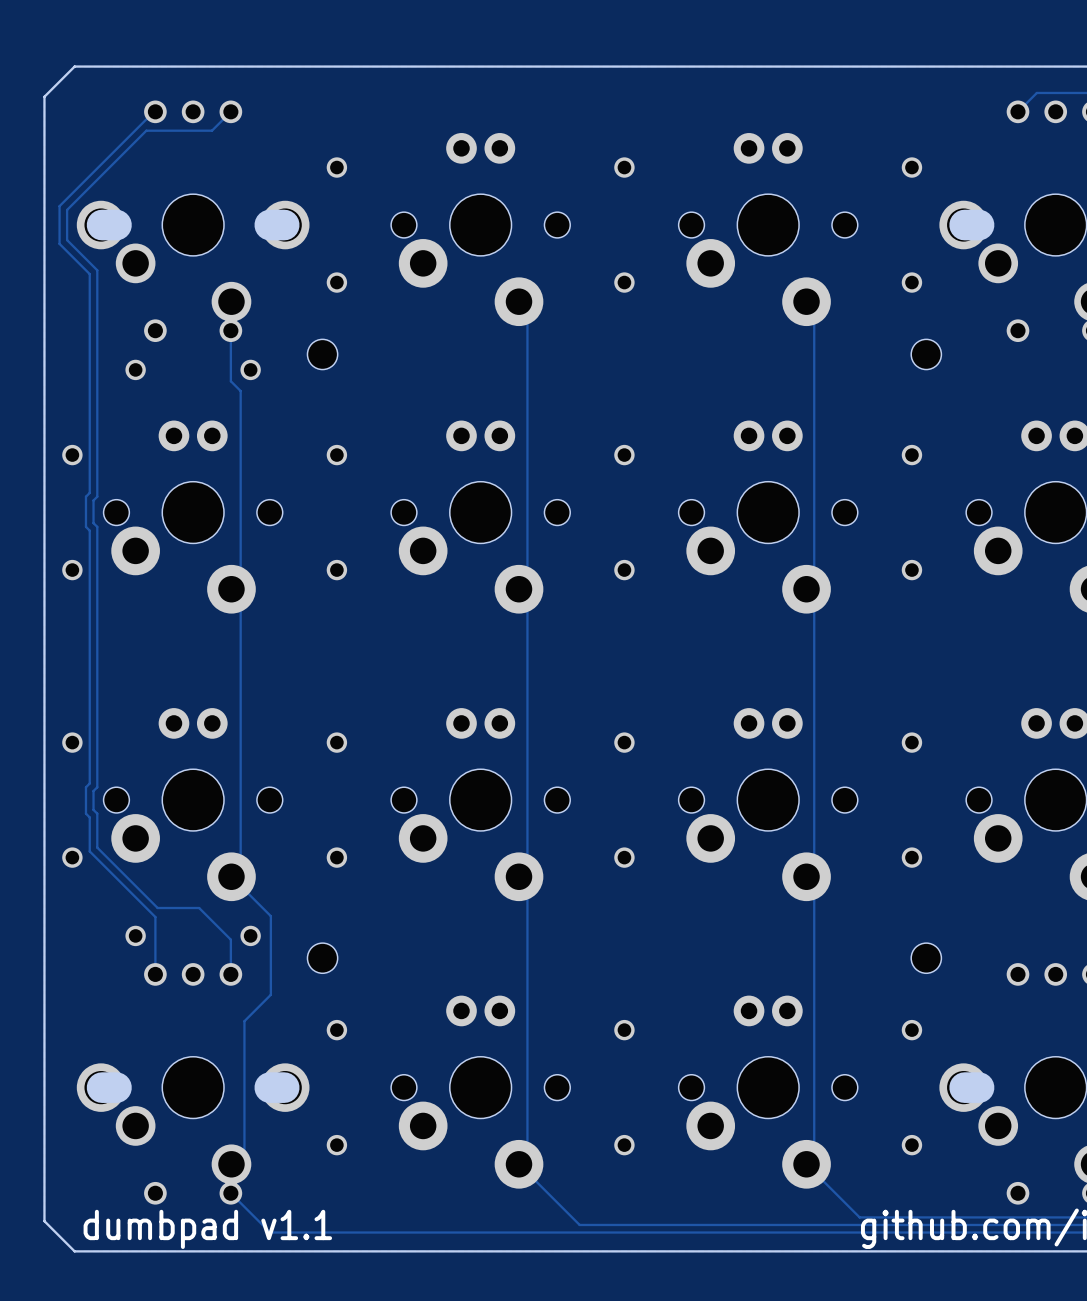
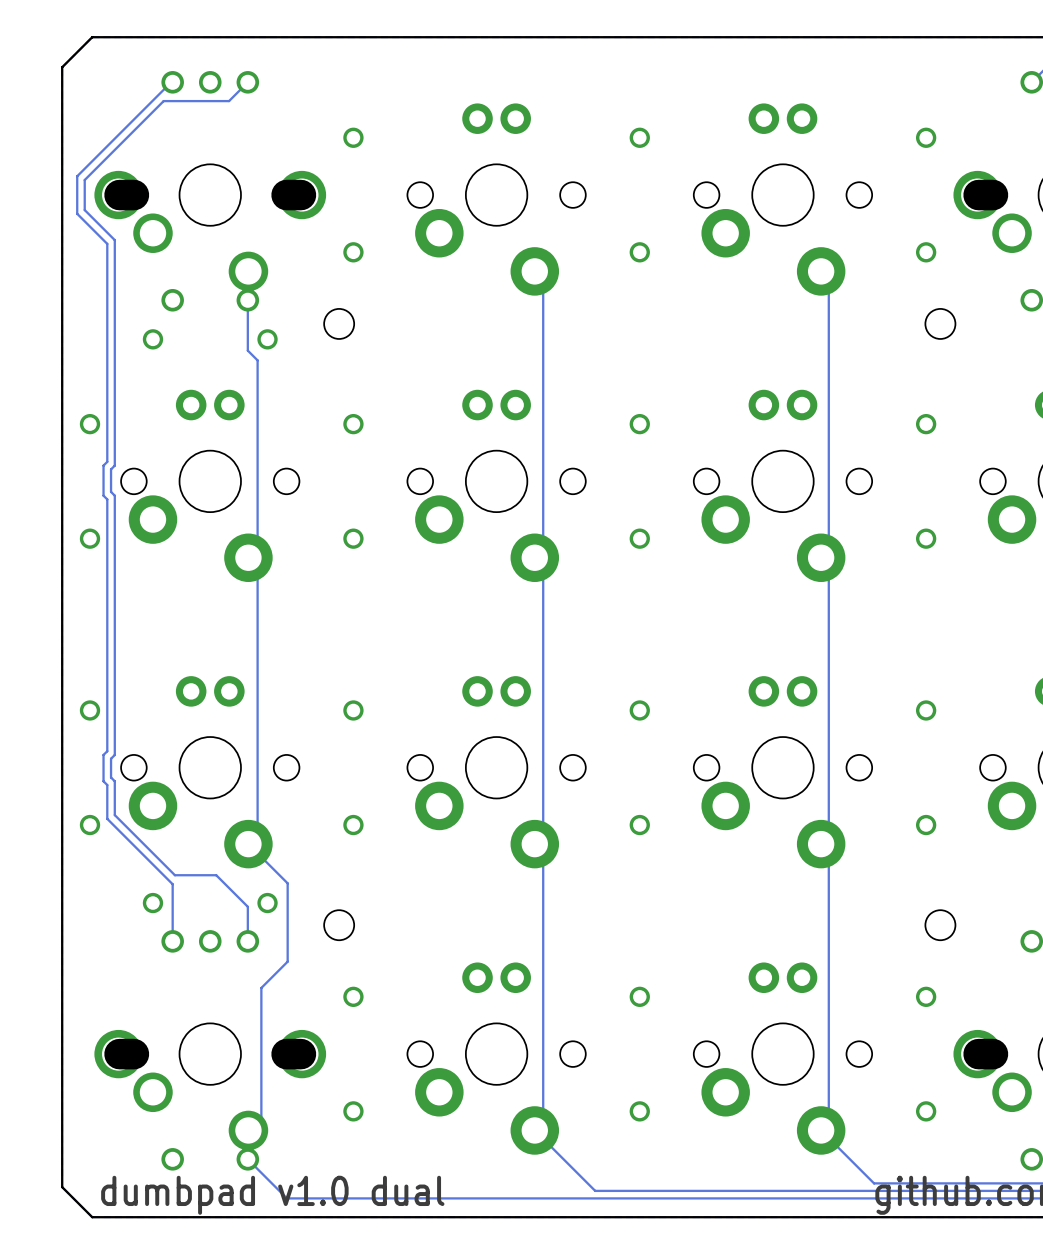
text: dumbpad v1.1 (207, 1229) -> dumbpad v1.0 dual (272, 1195)

